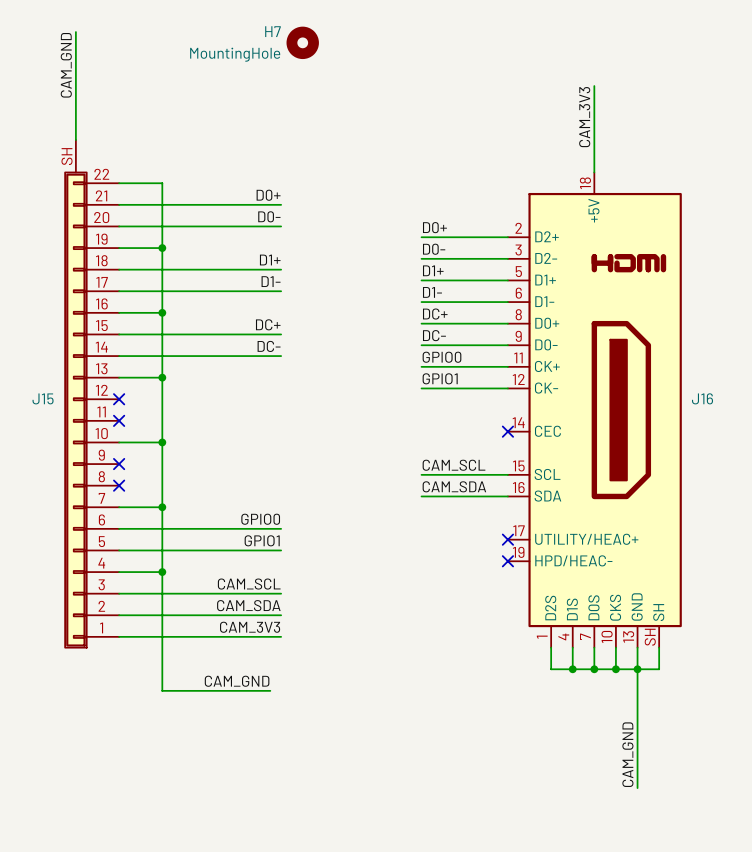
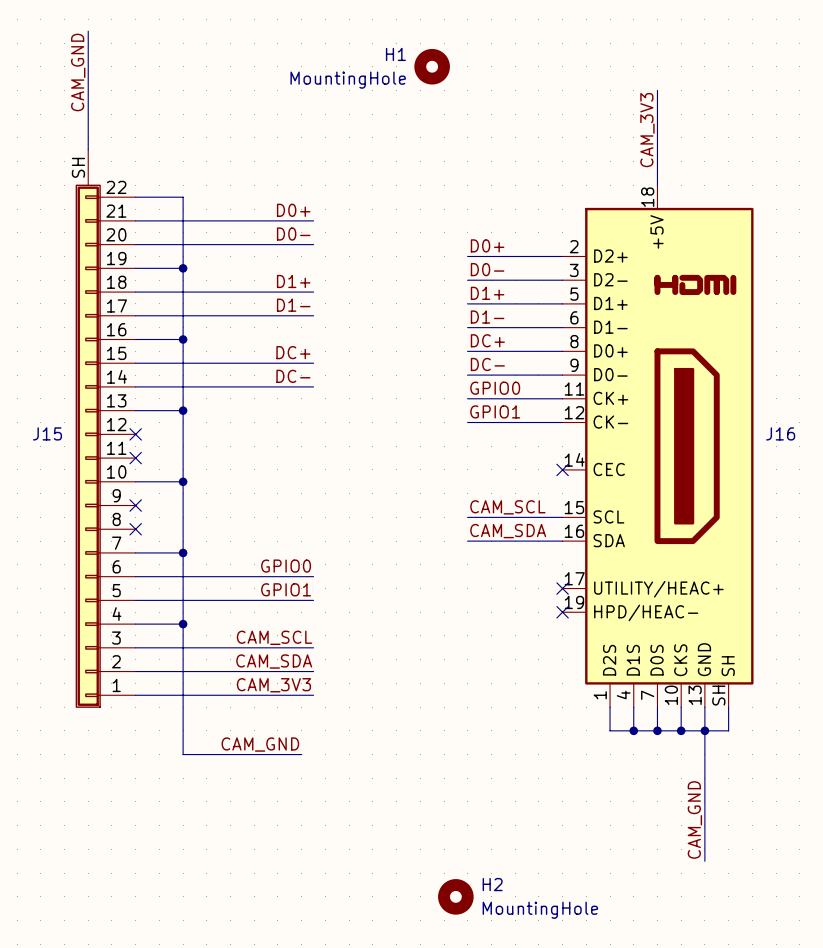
H7: MountingHole (302, 42) -> none
H1: none -> MountingHole (432, 66)
H2: none -> MountingHole (455, 896)

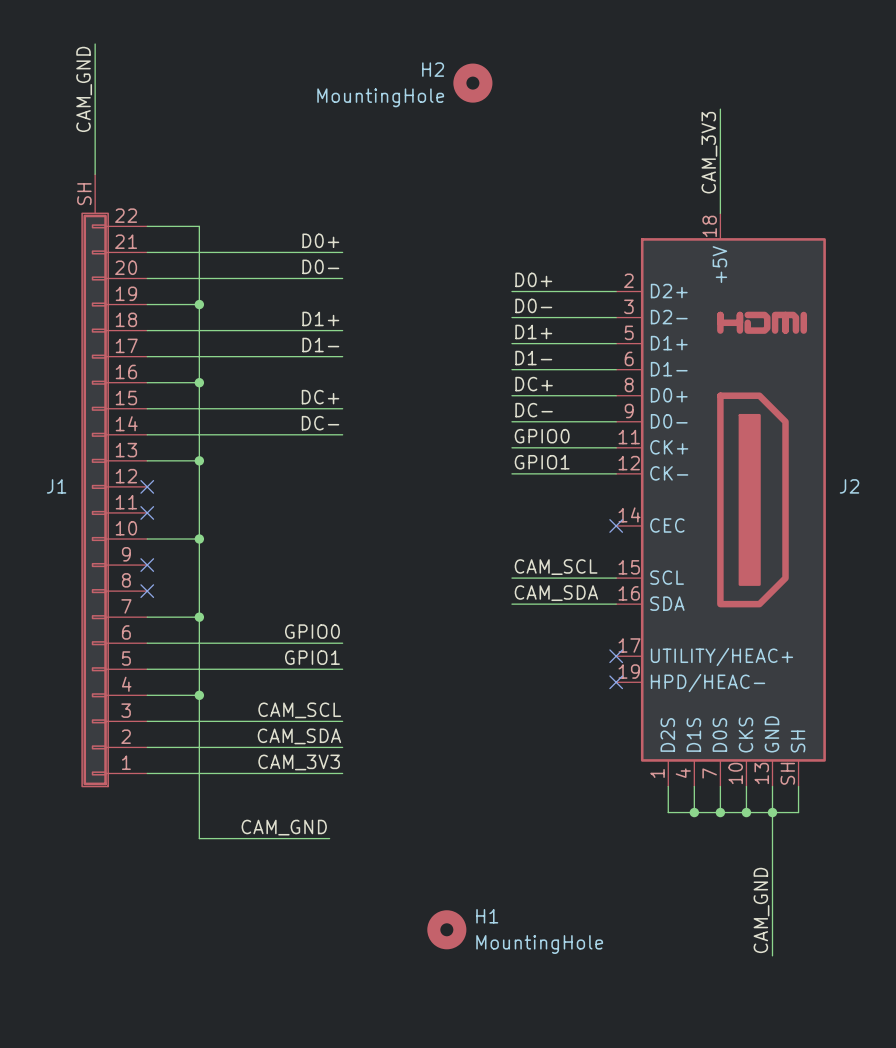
H1 name: H1 (395, 54) -> H2 (433, 69)
J15 name: J15 (47, 433) -> J1 (56, 486)
J16 name: J16 (780, 433) -> J2 (849, 486)
H1: none -> MountingHole (446, 929)
H2: MountingHole (455, 896) -> none

